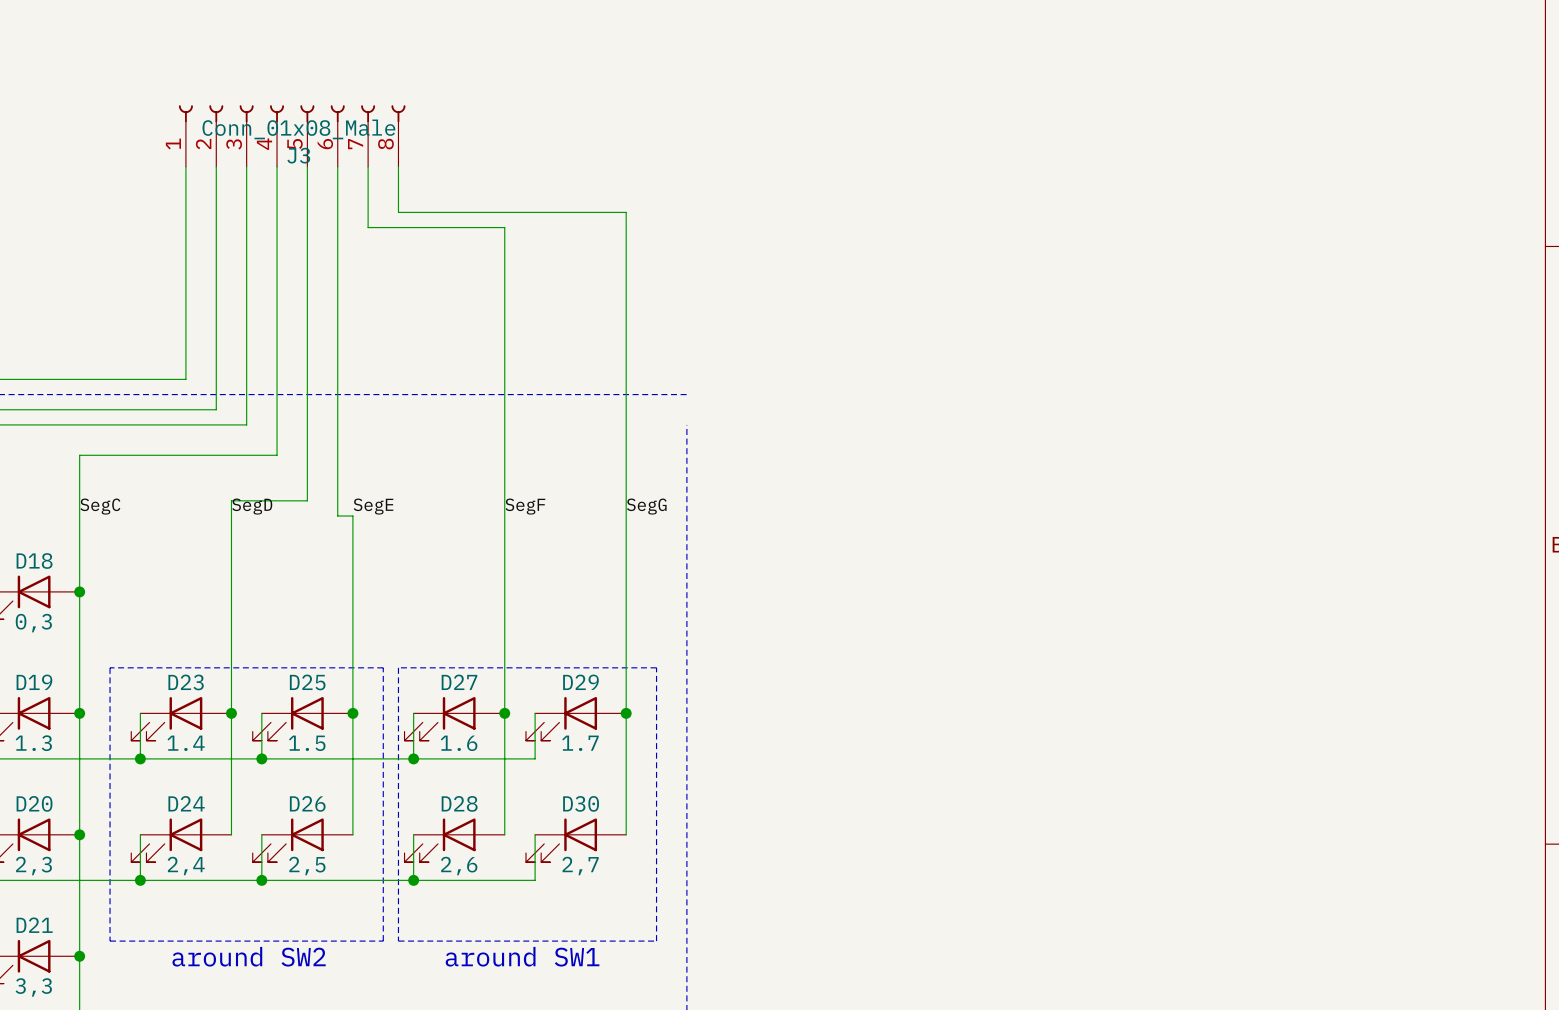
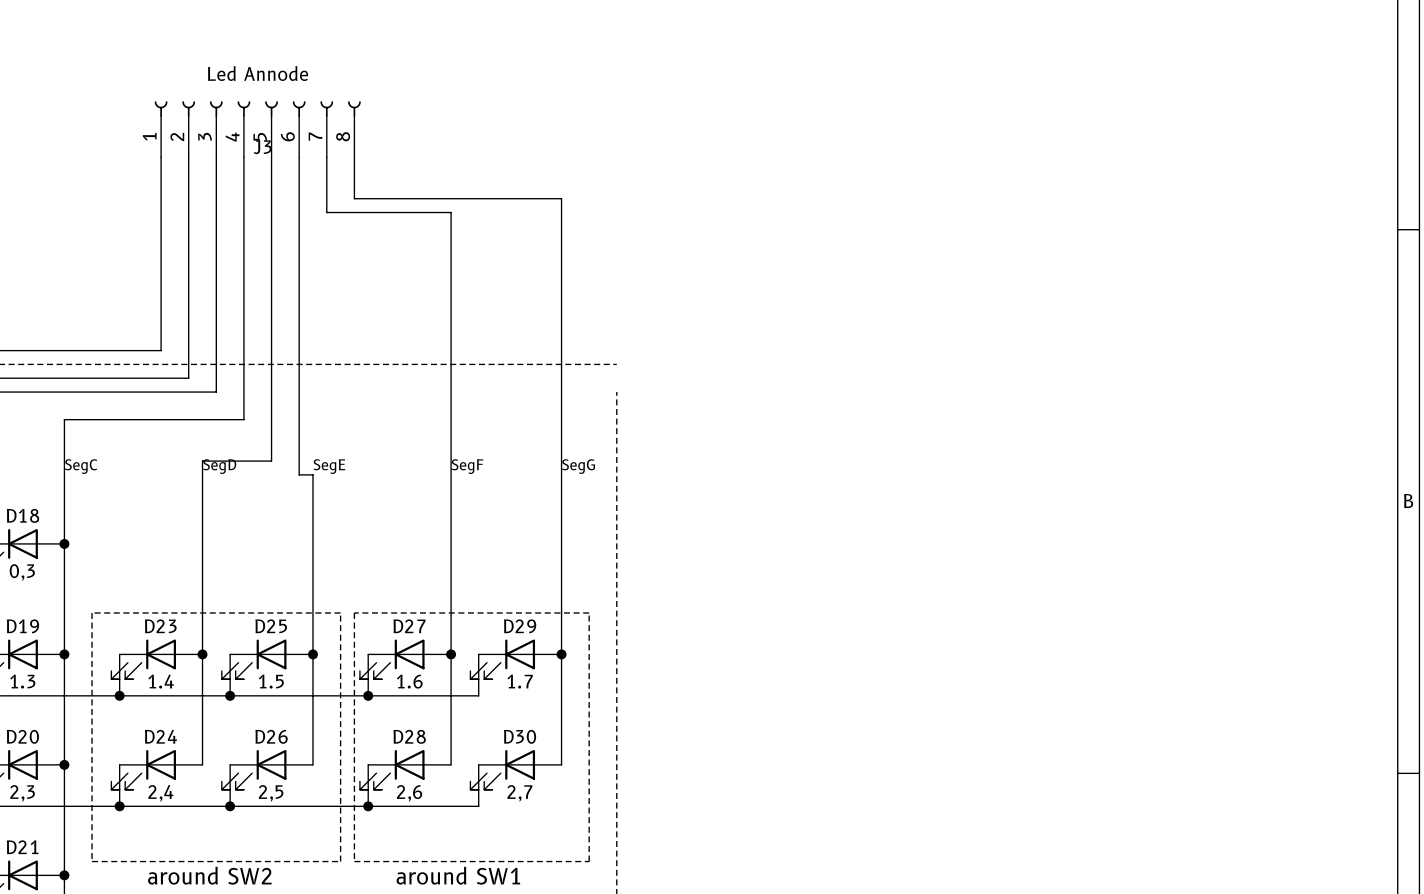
J3 value: Conn_01x08_Male (298, 129) -> Led Annode (257, 73)

